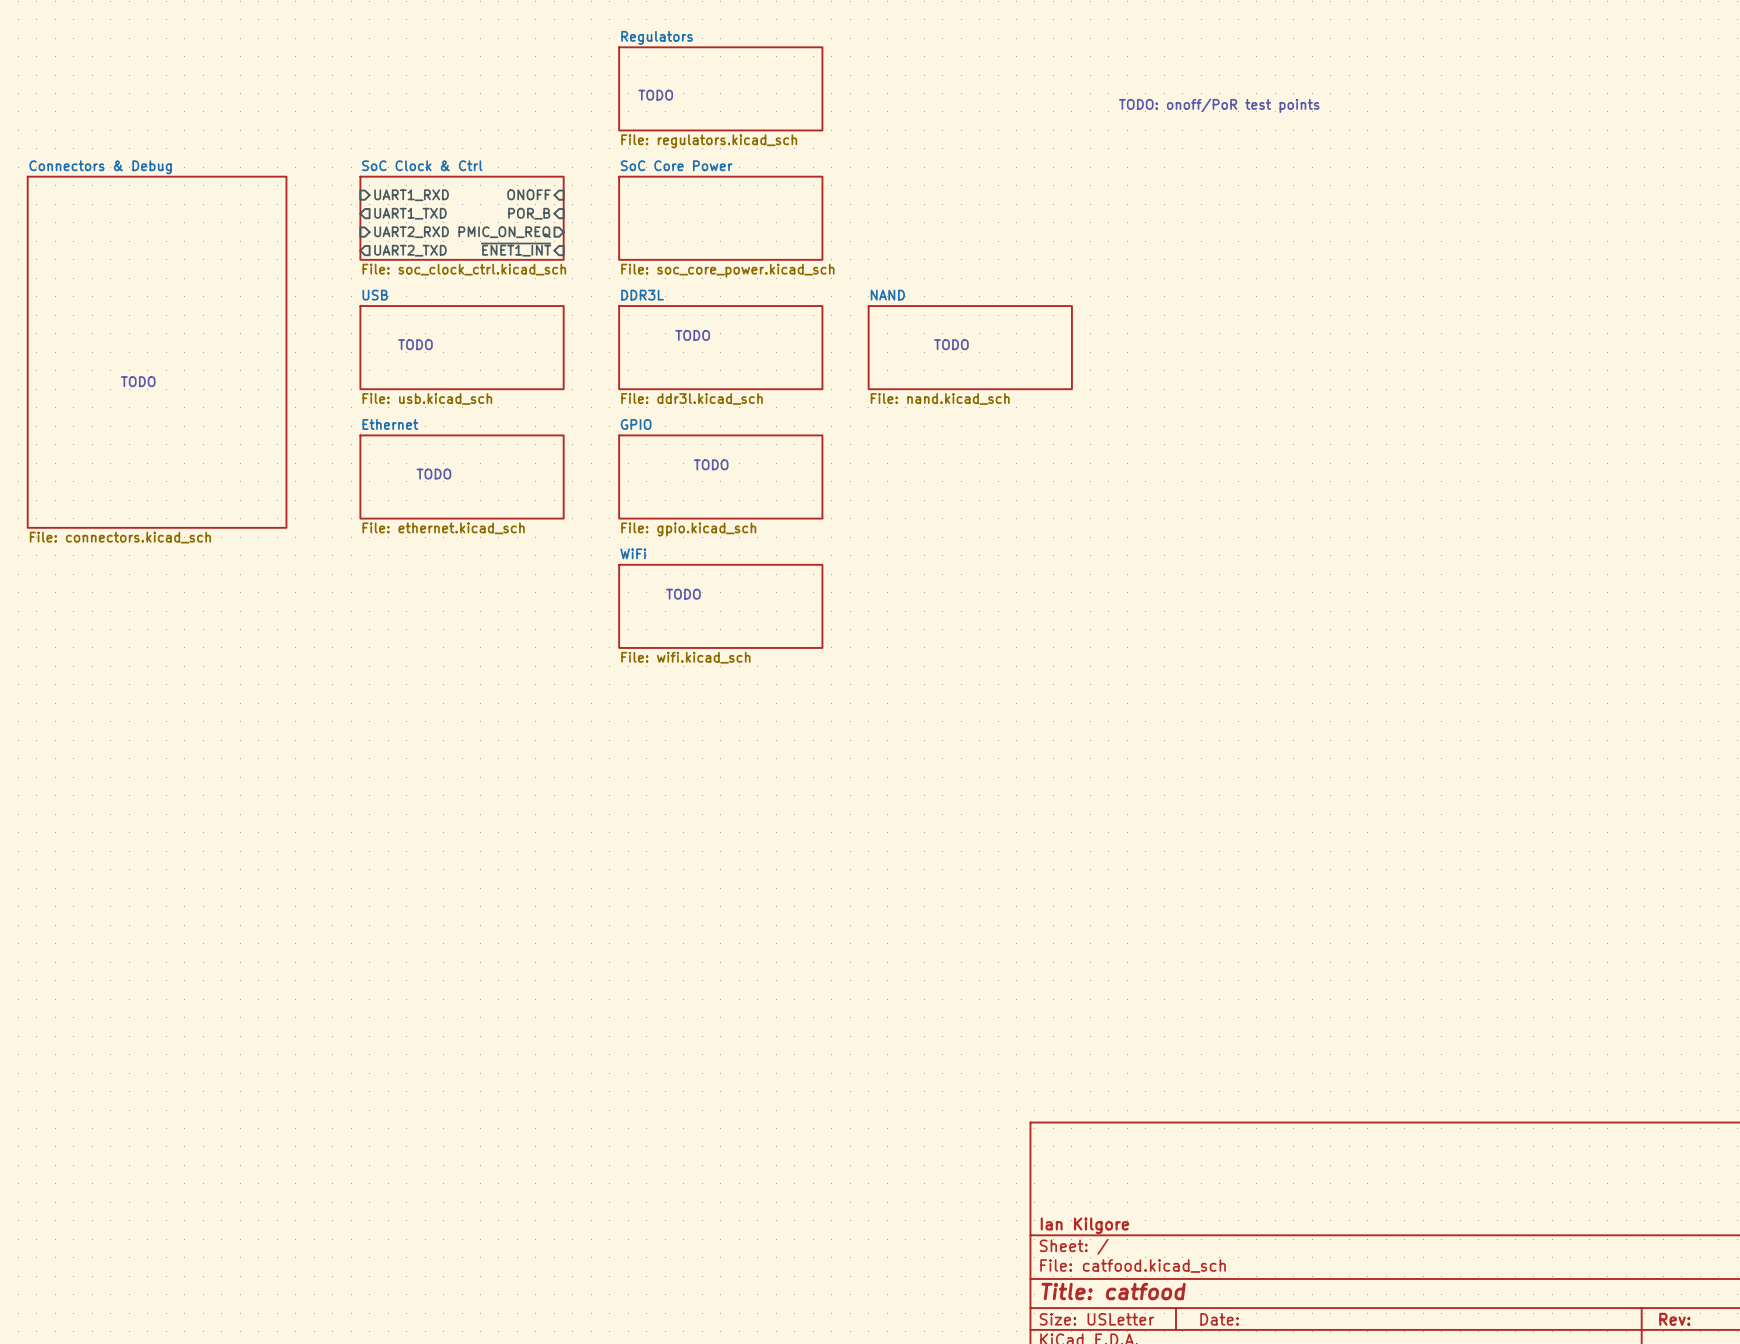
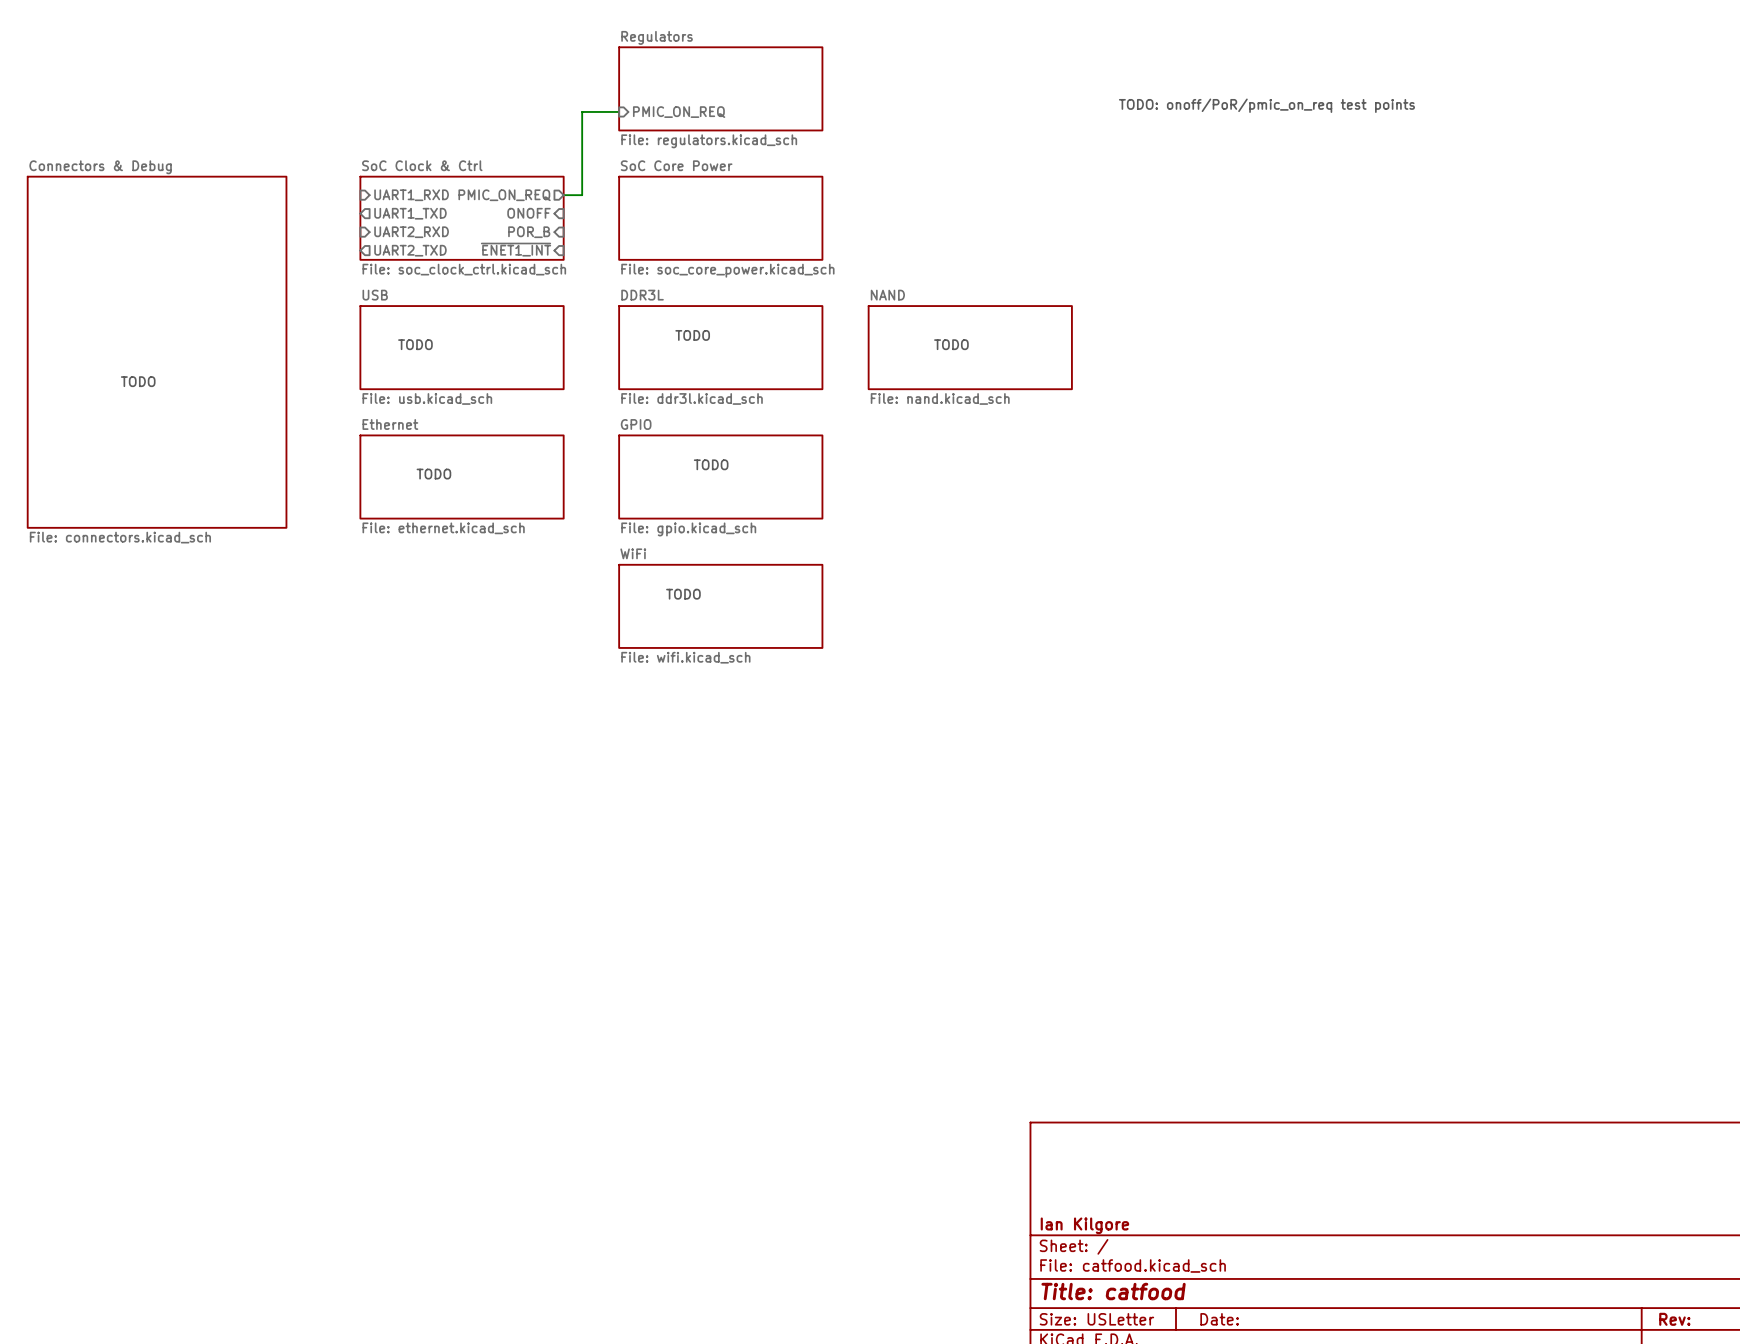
text: TODO (655, 95) -> none
text: TODO: onoff/PoR test points (1219, 105) -> TODO: onoff/PoR/pmic_on_req test points (1266, 105)
wire: none -> (619, 111) (582, 111) (582, 195) (563, 195)
sheet pin: none -> PMIC_ON_REQ (679, 112)
sheet pin shape: input (528, 194) -> output (504, 195)
sheet pin: ONOFF (528, 194) -> PMIC_ON_REQ (504, 195)
sheet pin: POR_B (529, 213) -> ONOFF (528, 213)
sheet pin shape: output (504, 232) -> input (529, 232)
sheet pin: PMIC_ON_REQ (504, 232) -> POR_B (529, 232)

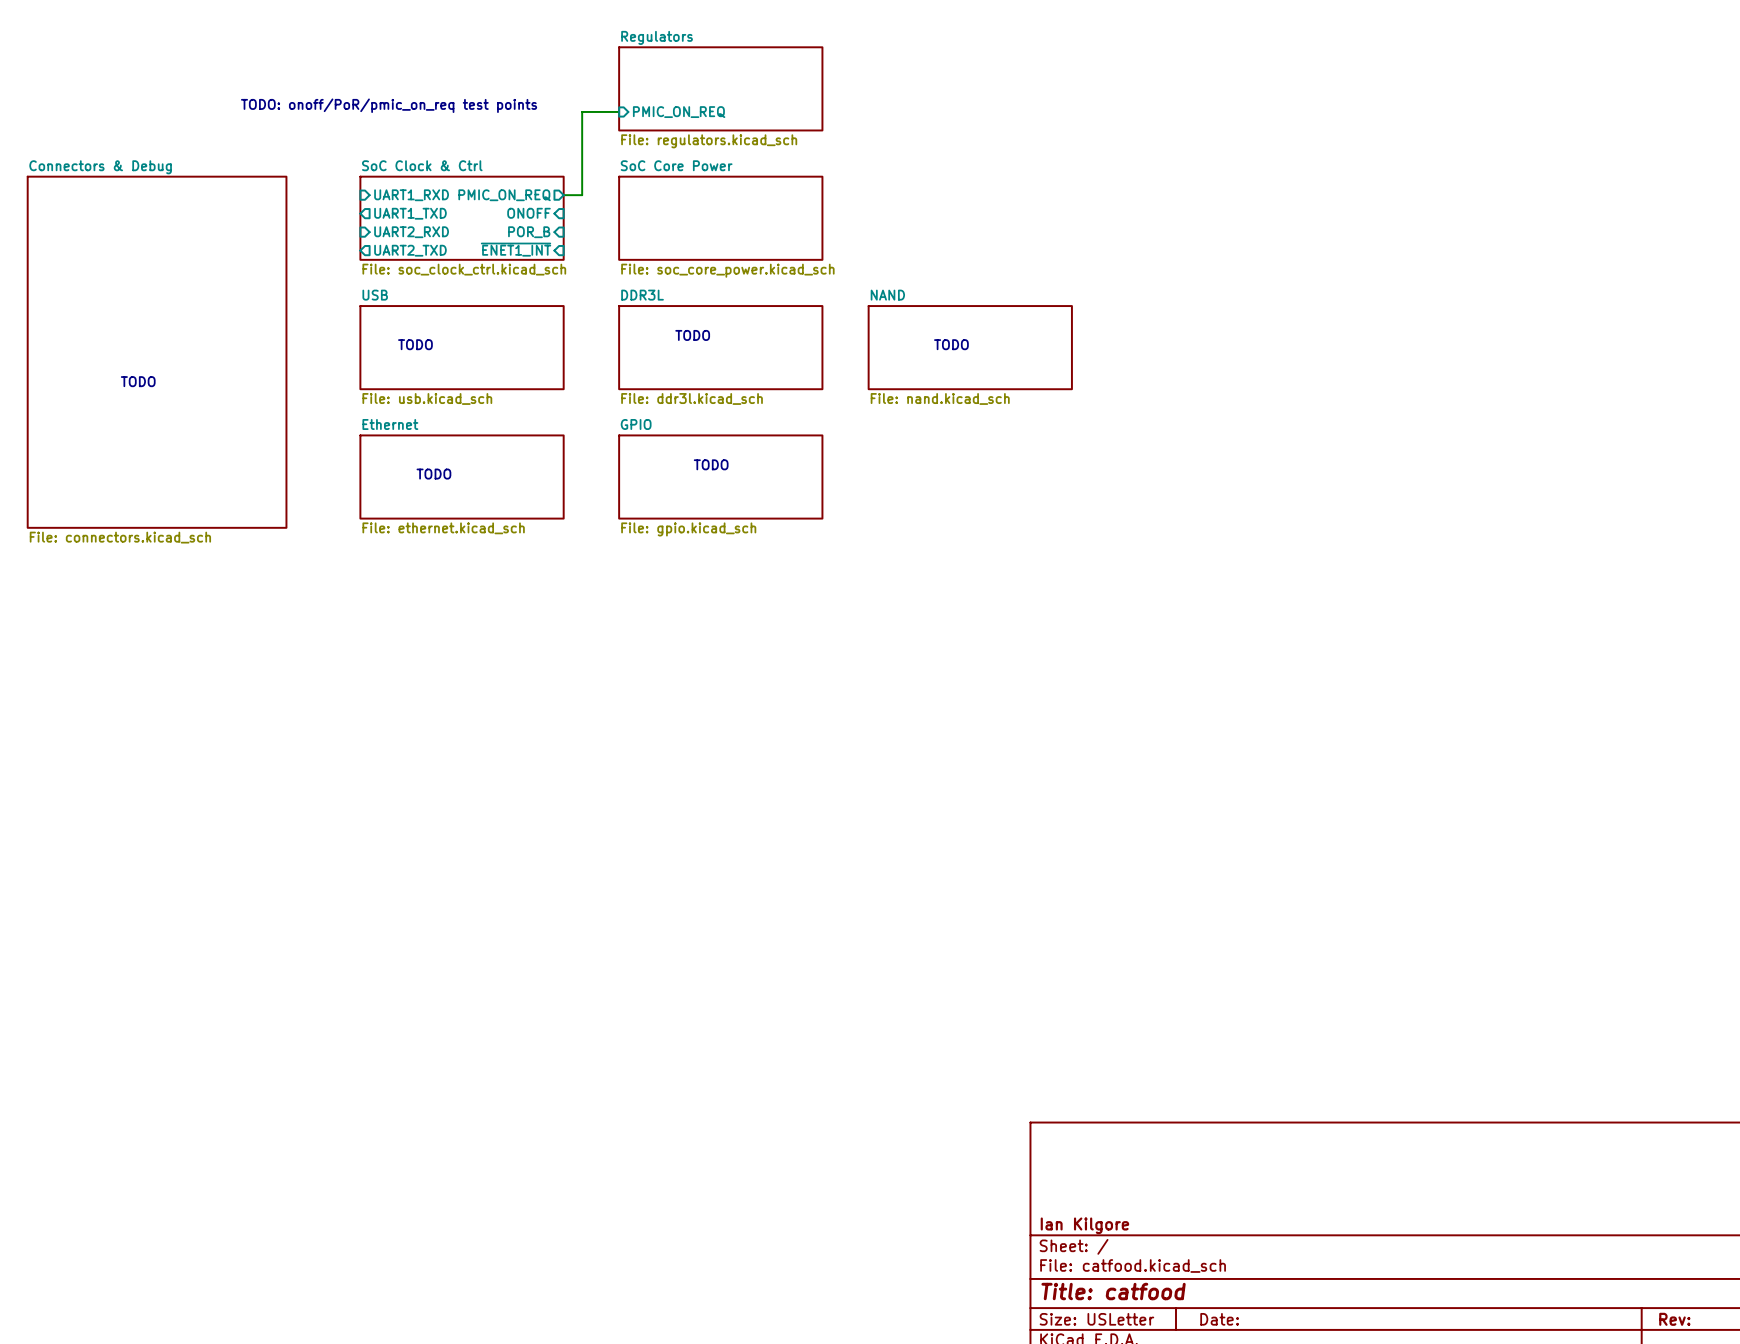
text: none -> TODO: onoff/PoR/pmic_on_req test points (389, 105)
text: TODO: onoff/PoR/pmic_on_req test points (1266, 105) -> none
text: TODO (683, 594) -> none
sheet WiFi: File: wifi.kicad_sch (720, 606) -> none

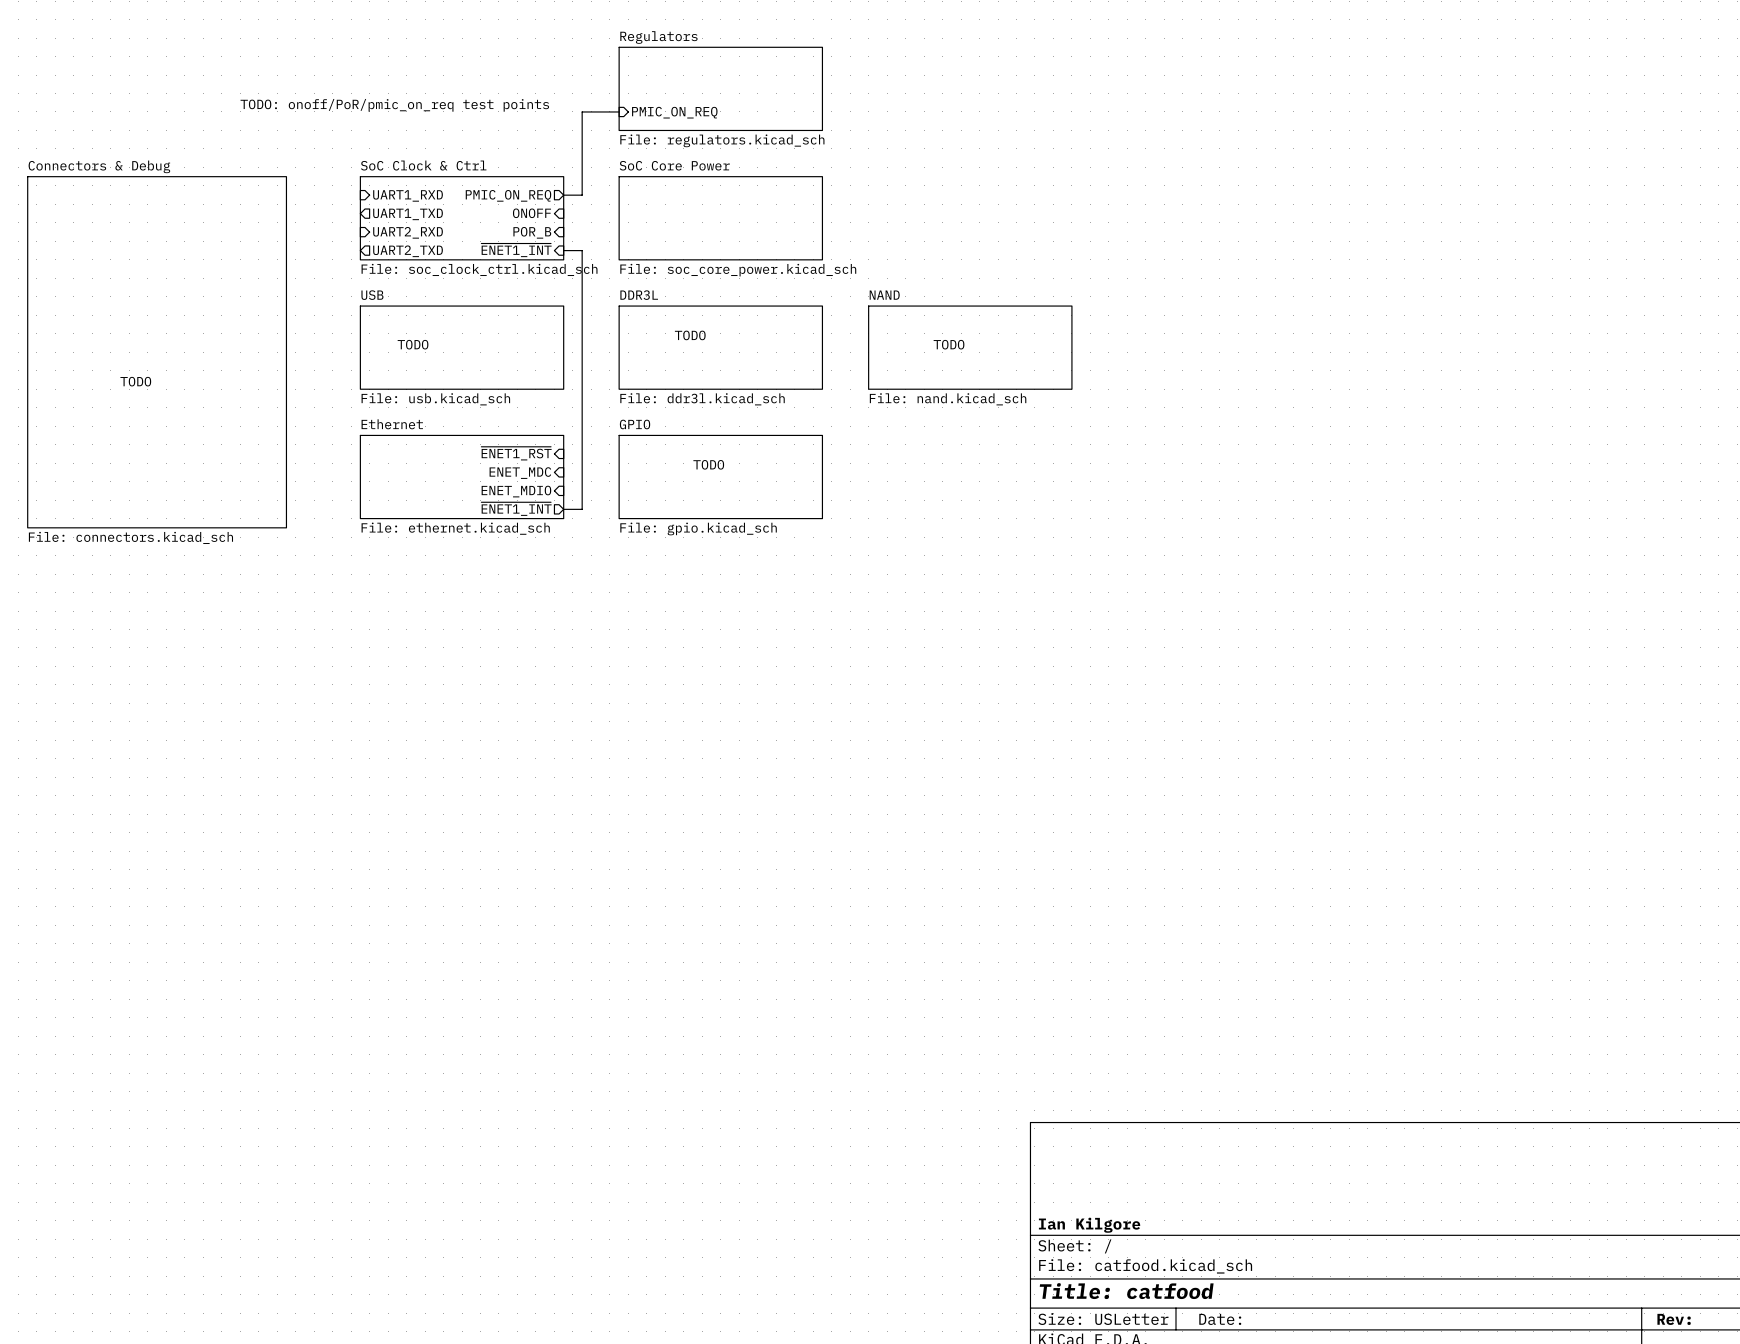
wire: none -> (563, 250) (582, 250) (582, 509) (563, 509)
sheet pin: none -> ~{ENET1_RST} (516, 453)
sheet pin: none -> ENET_MDC (520, 473)
text: TODO (433, 474) -> none
sheet pin: none -> ENET_MDIO (516, 491)
sheet pin: none -> ~{ENET1_INT} (516, 509)

